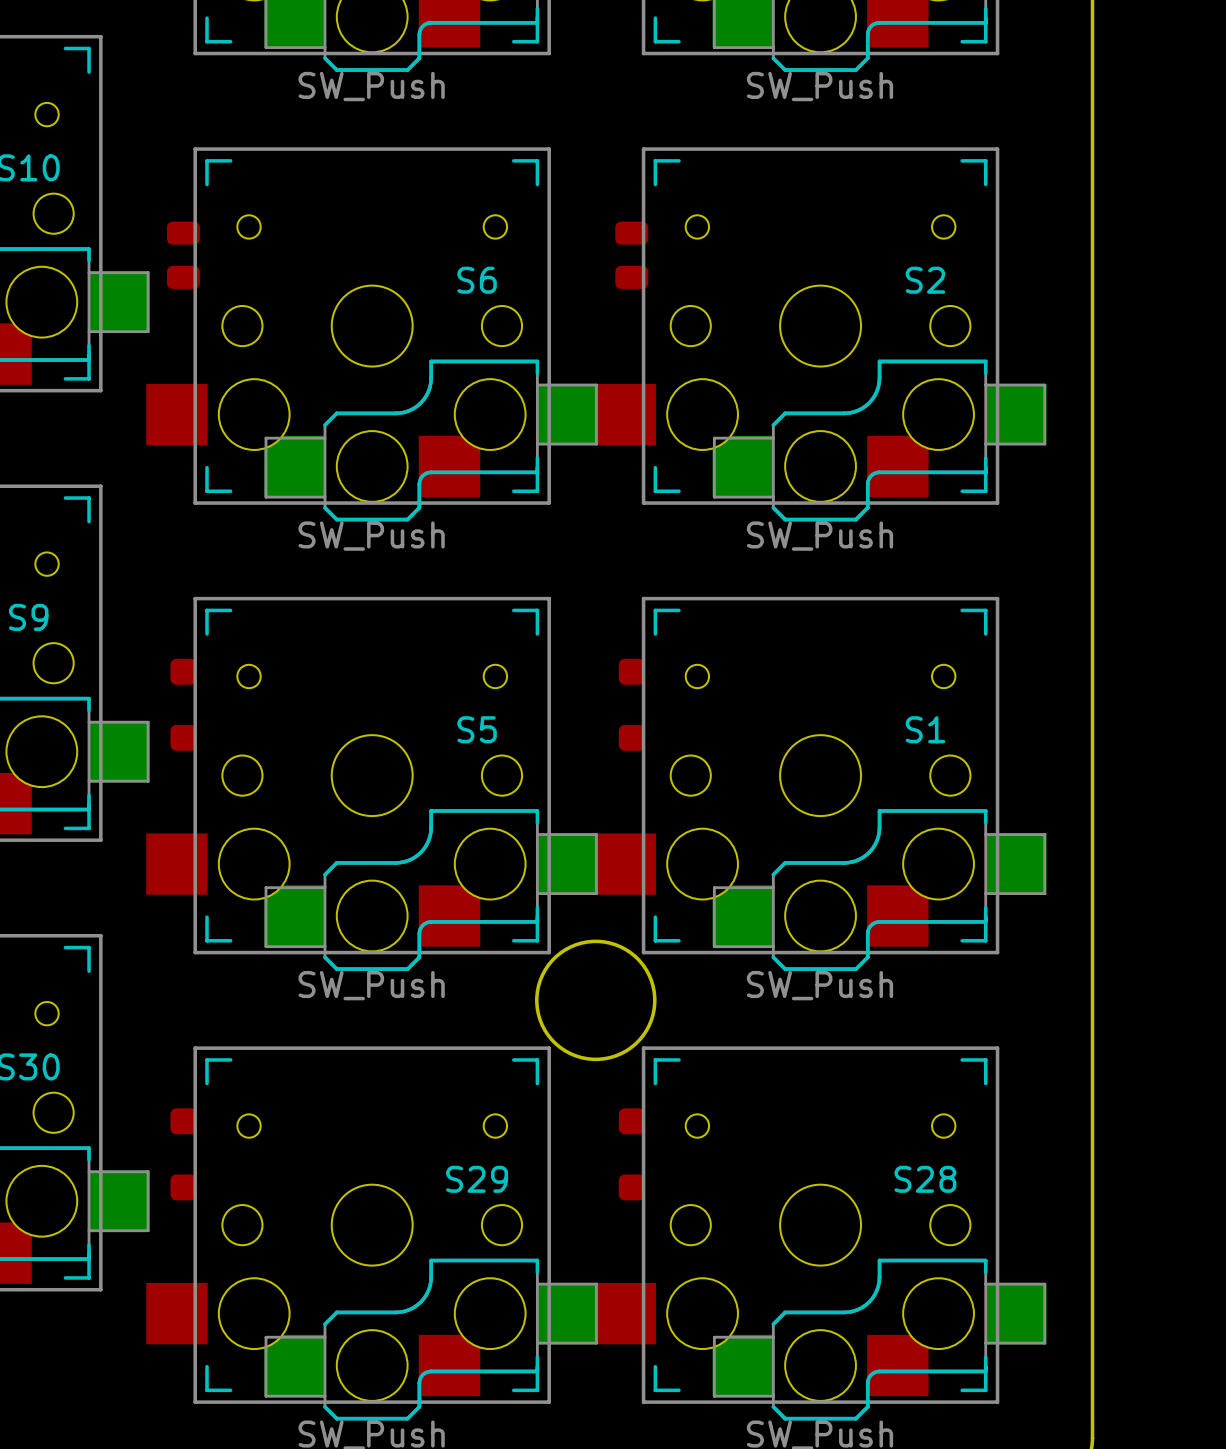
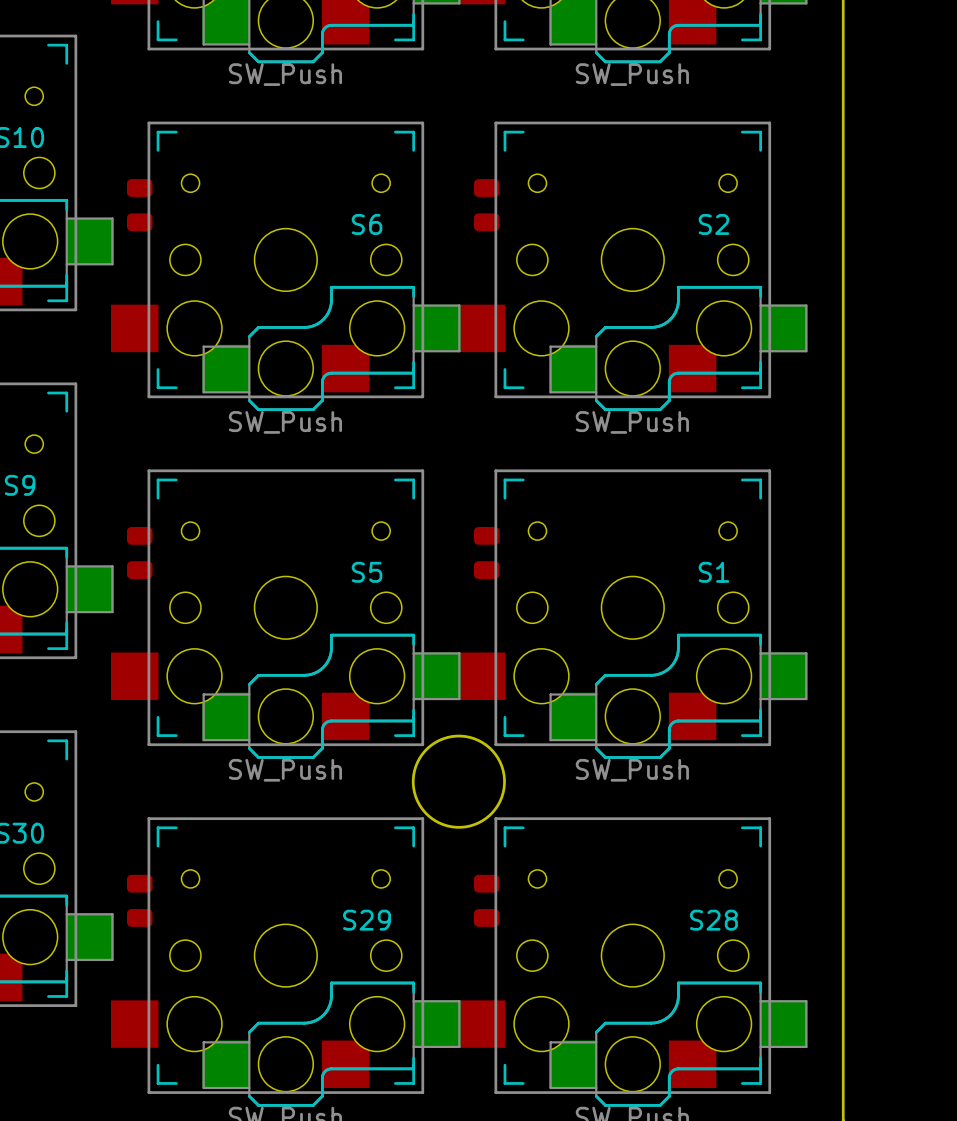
part footprint: [170, 658, 197, 751] -> [126, 526, 153, 580]
part footprint: [618, 658, 645, 751] -> [473, 526, 500, 580]
part footprint: [170, 1108, 197, 1201] -> [126, 874, 153, 927]
part footprint: [618, 1108, 645, 1201] -> [473, 874, 500, 927]

